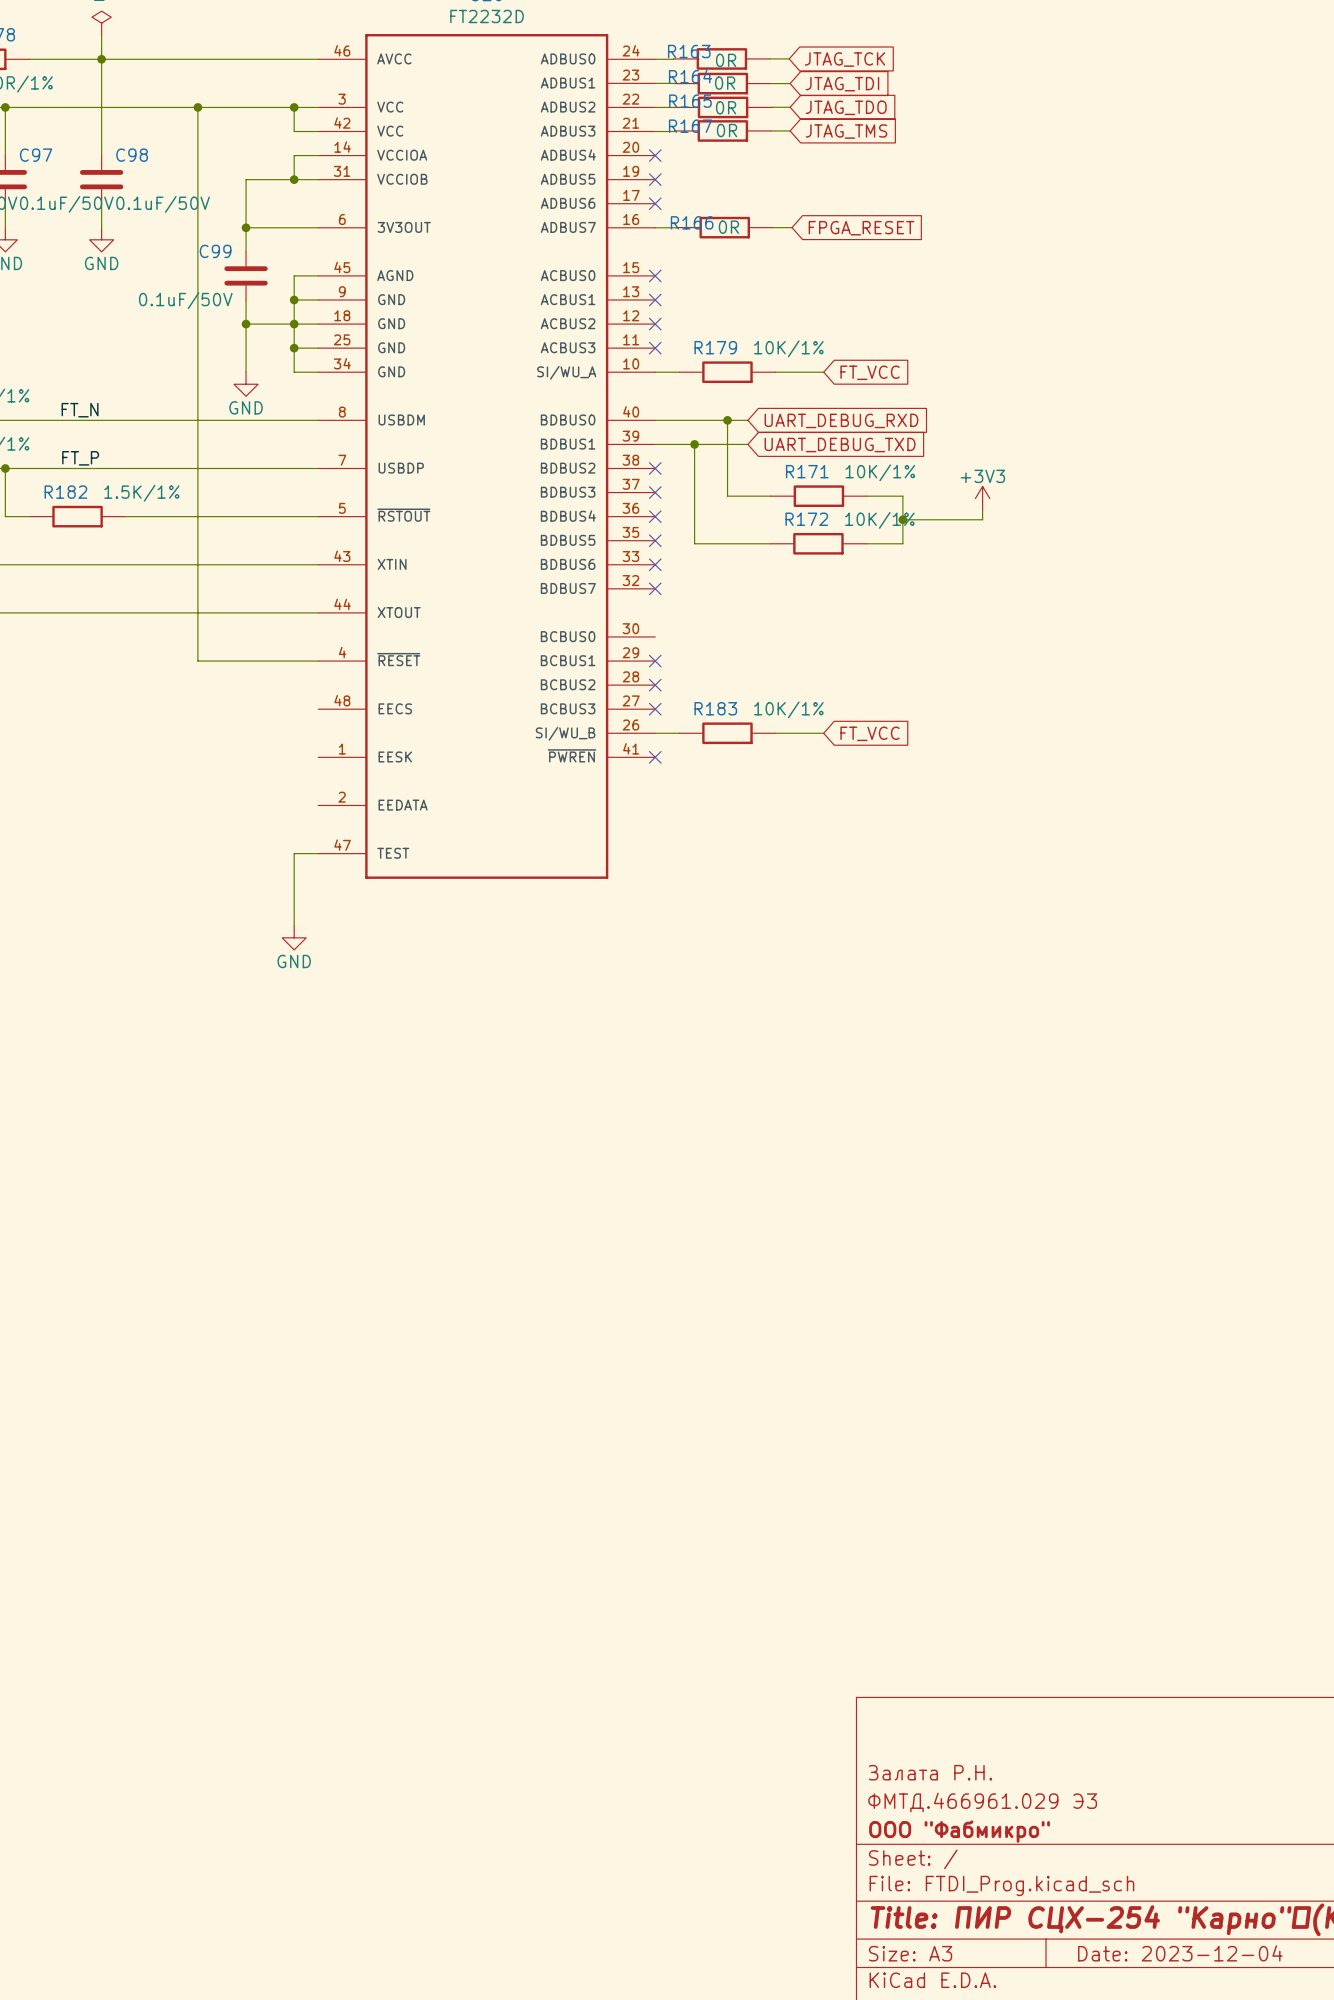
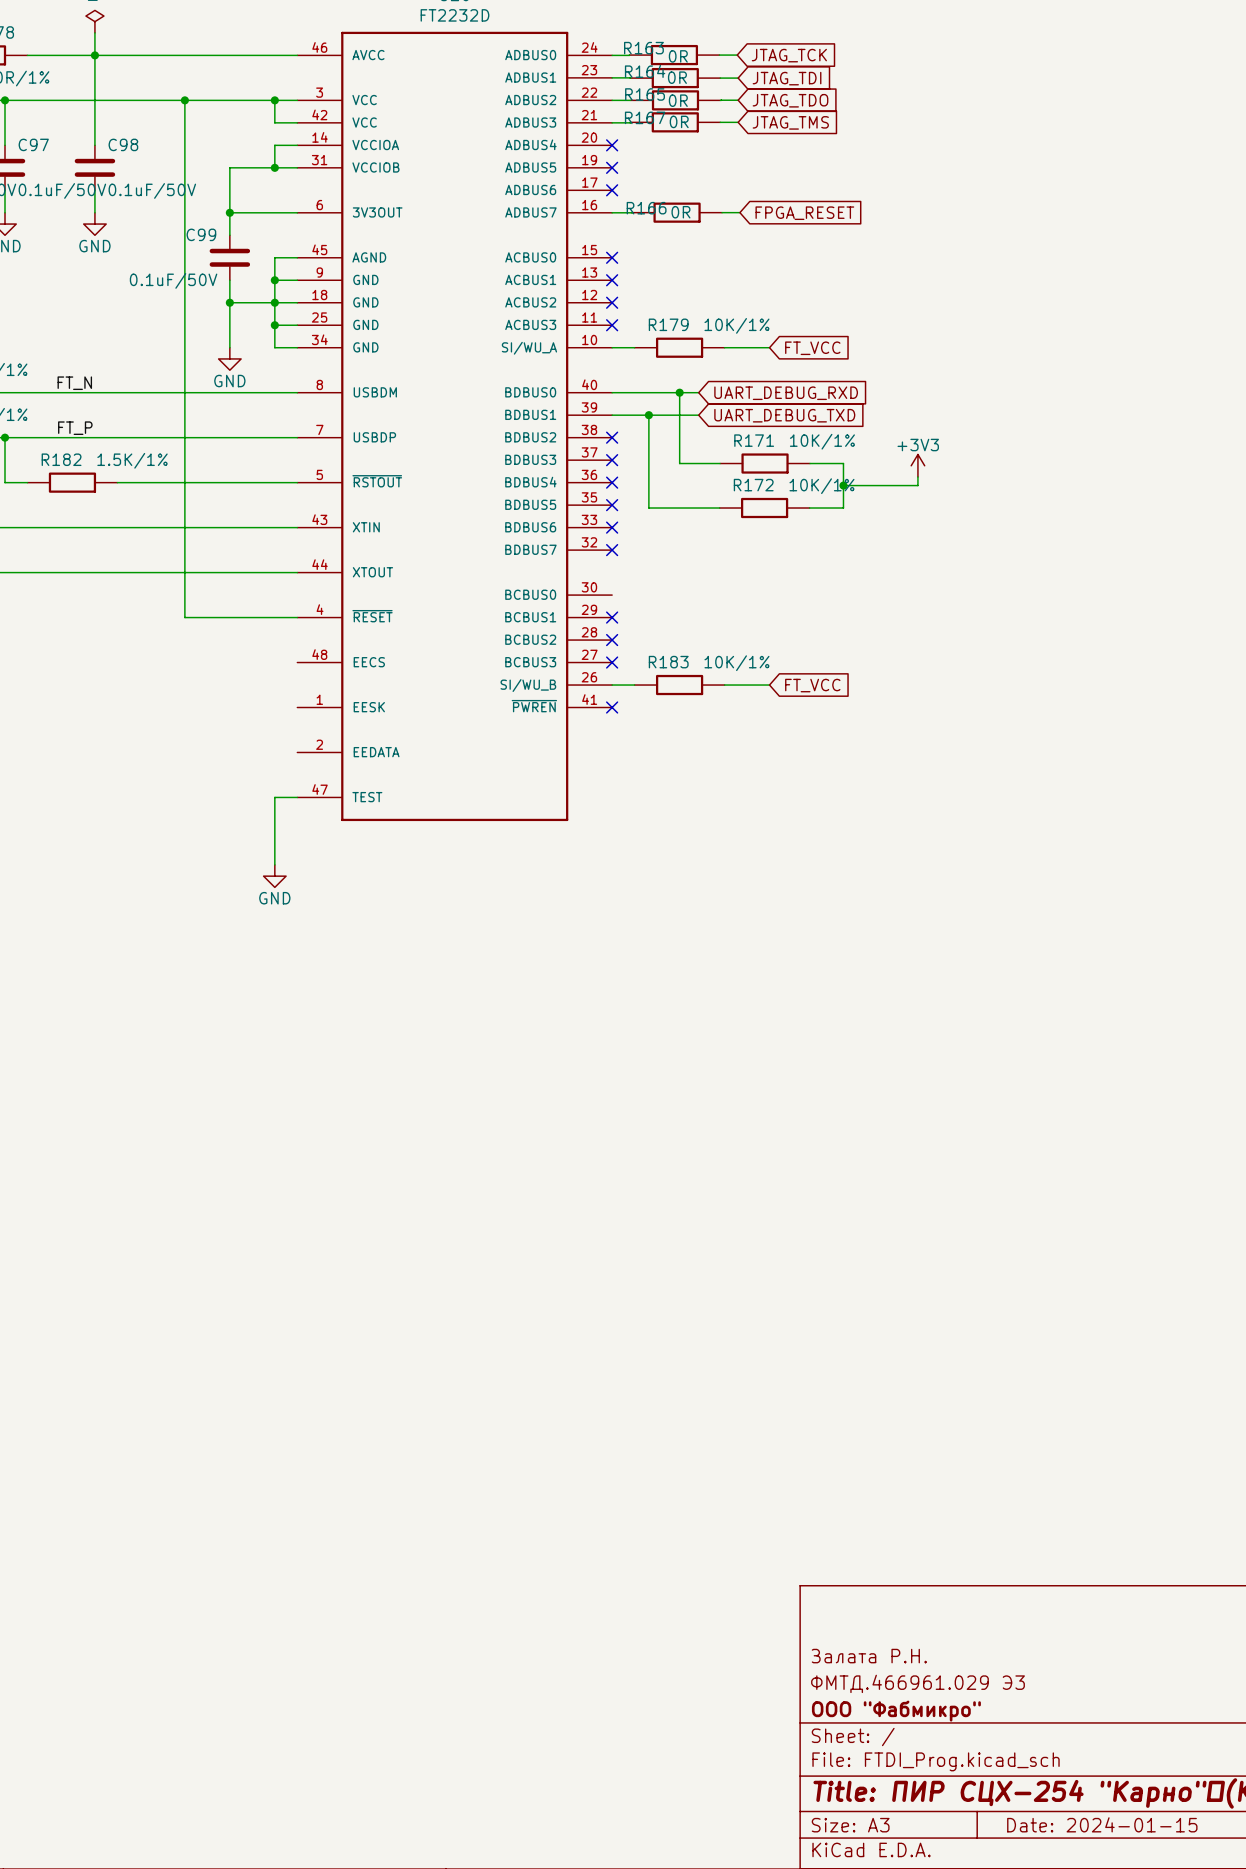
title block: Date: 2023-12-04 (1180, 1953) -> Date: 2024-01-15 (1102, 1824)

